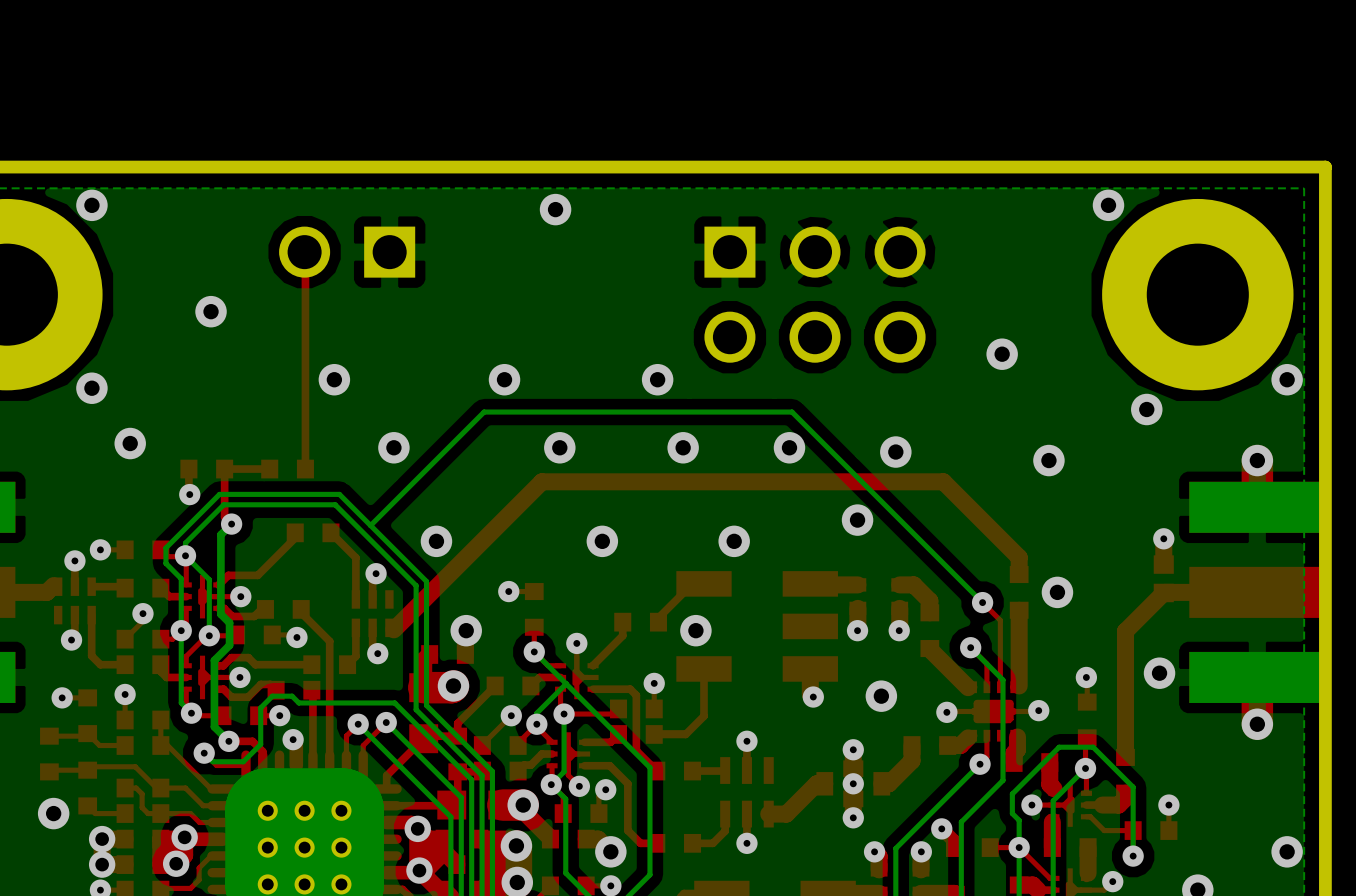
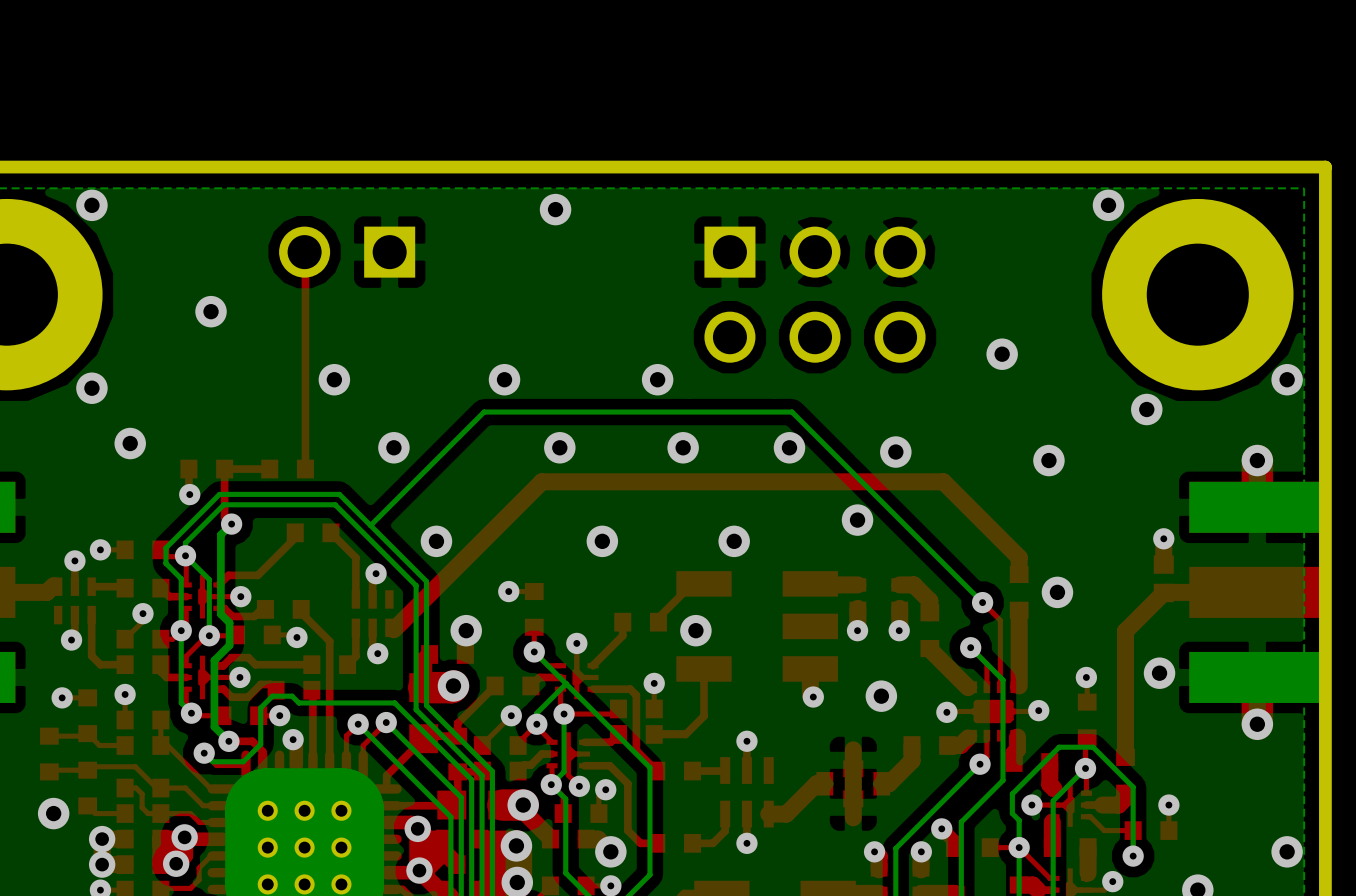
via: (853, 749) -> none
via: (853, 783) -> none
via: (853, 817) -> none

